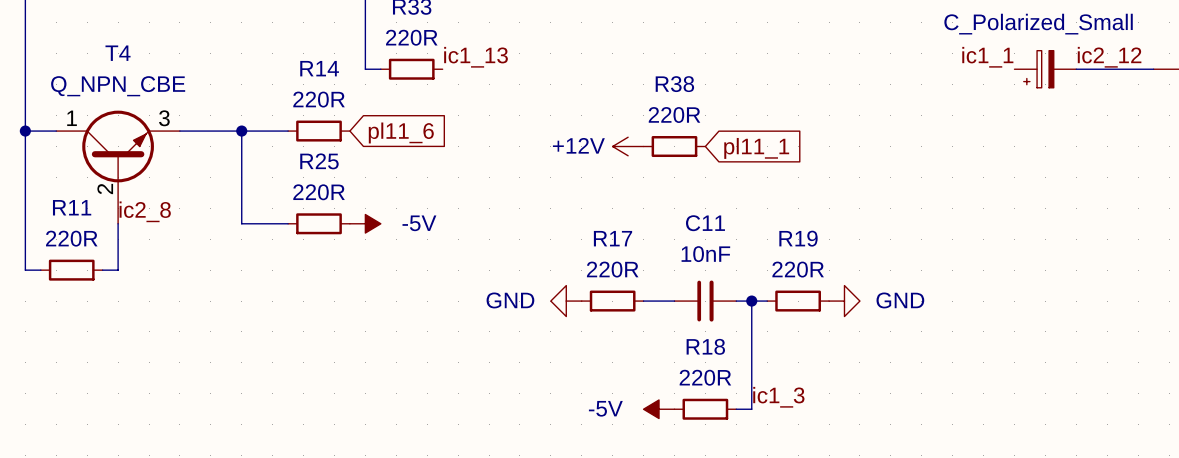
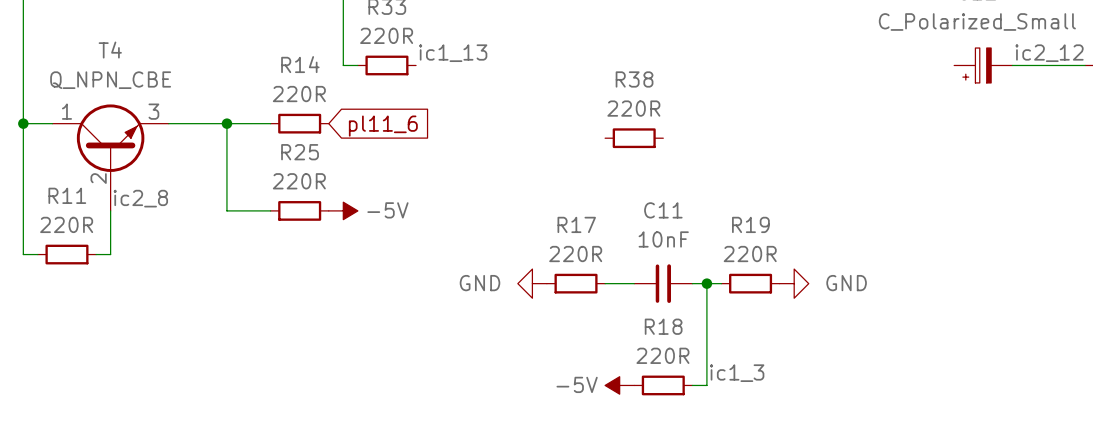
label: ic1_1 (987, 57) -> none
power symbol: +12V (628, 146) -> none
global label: pl11_1 (756, 148) -> none

